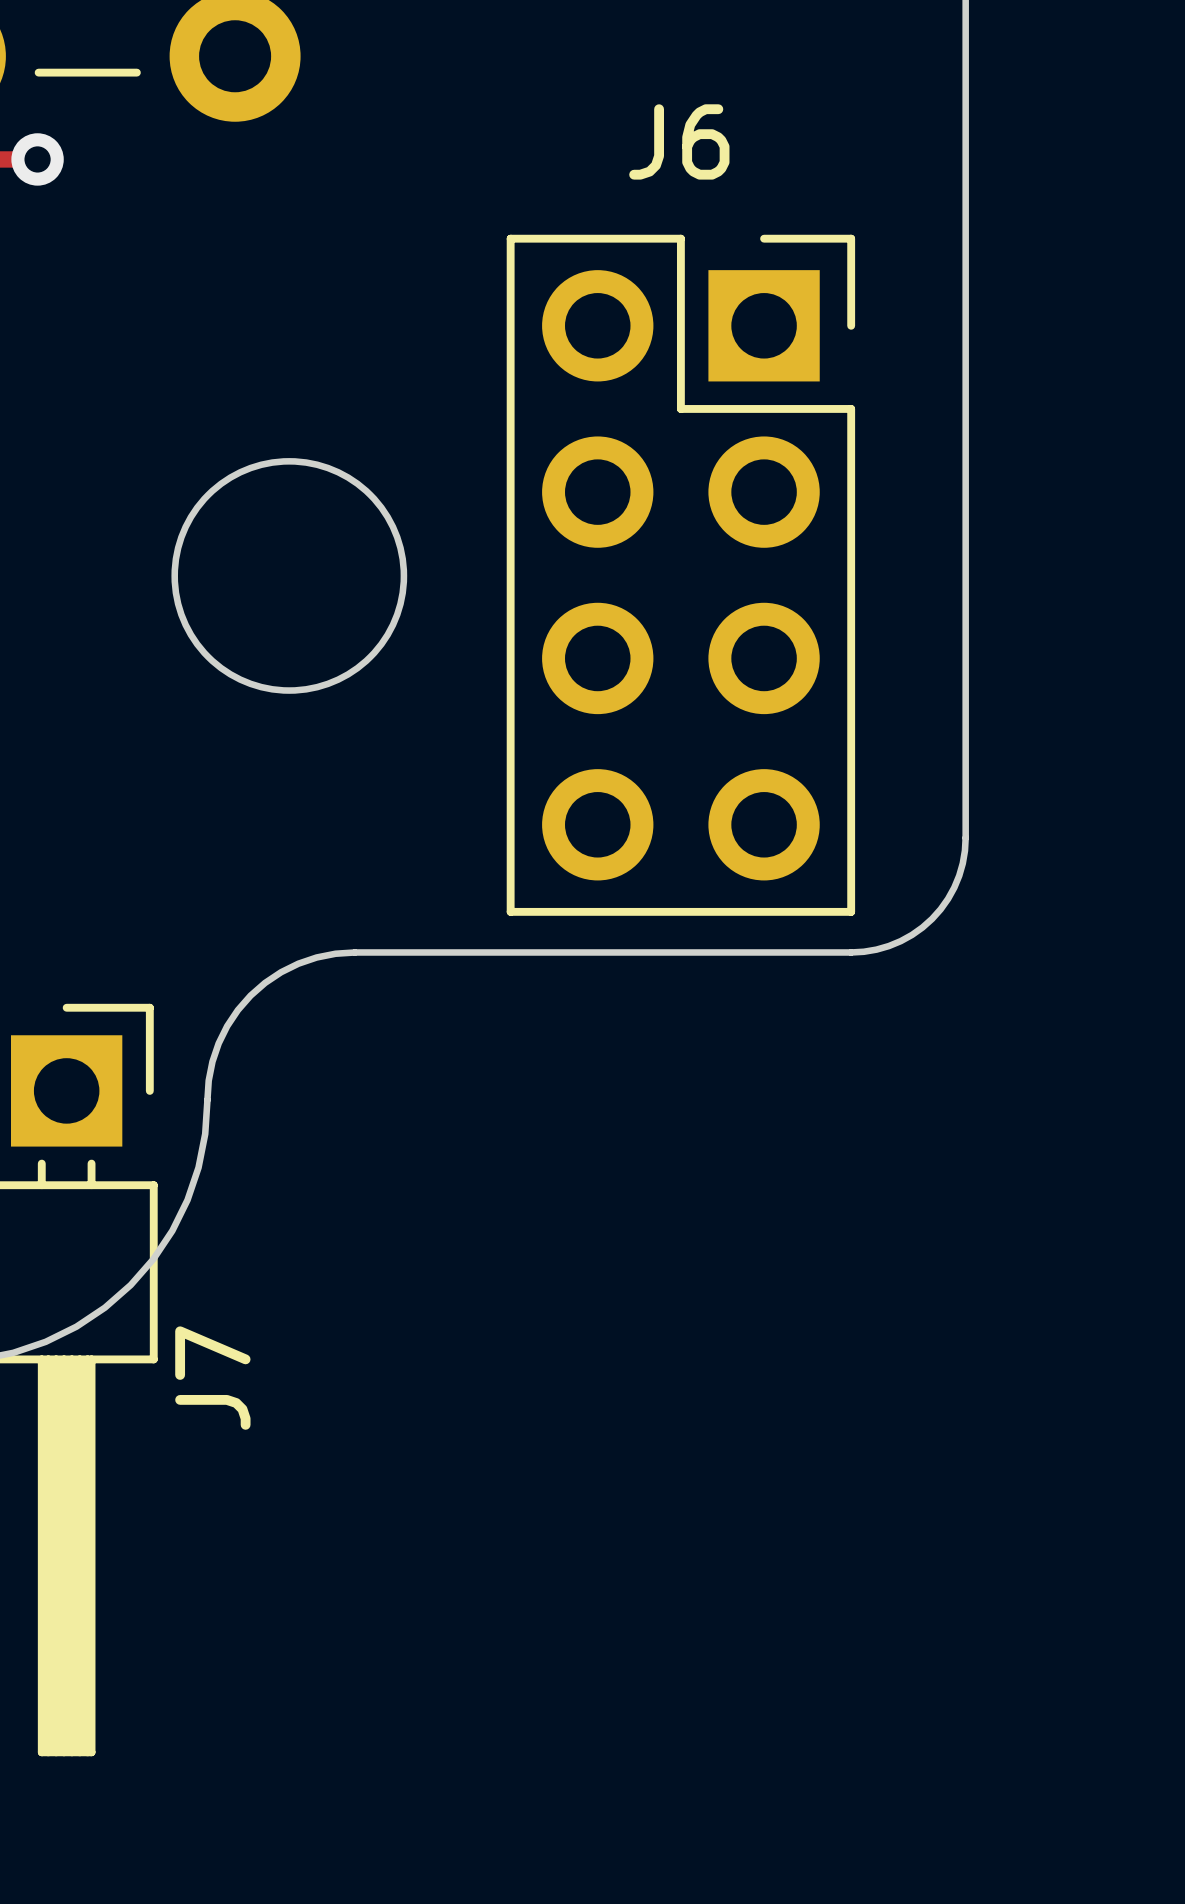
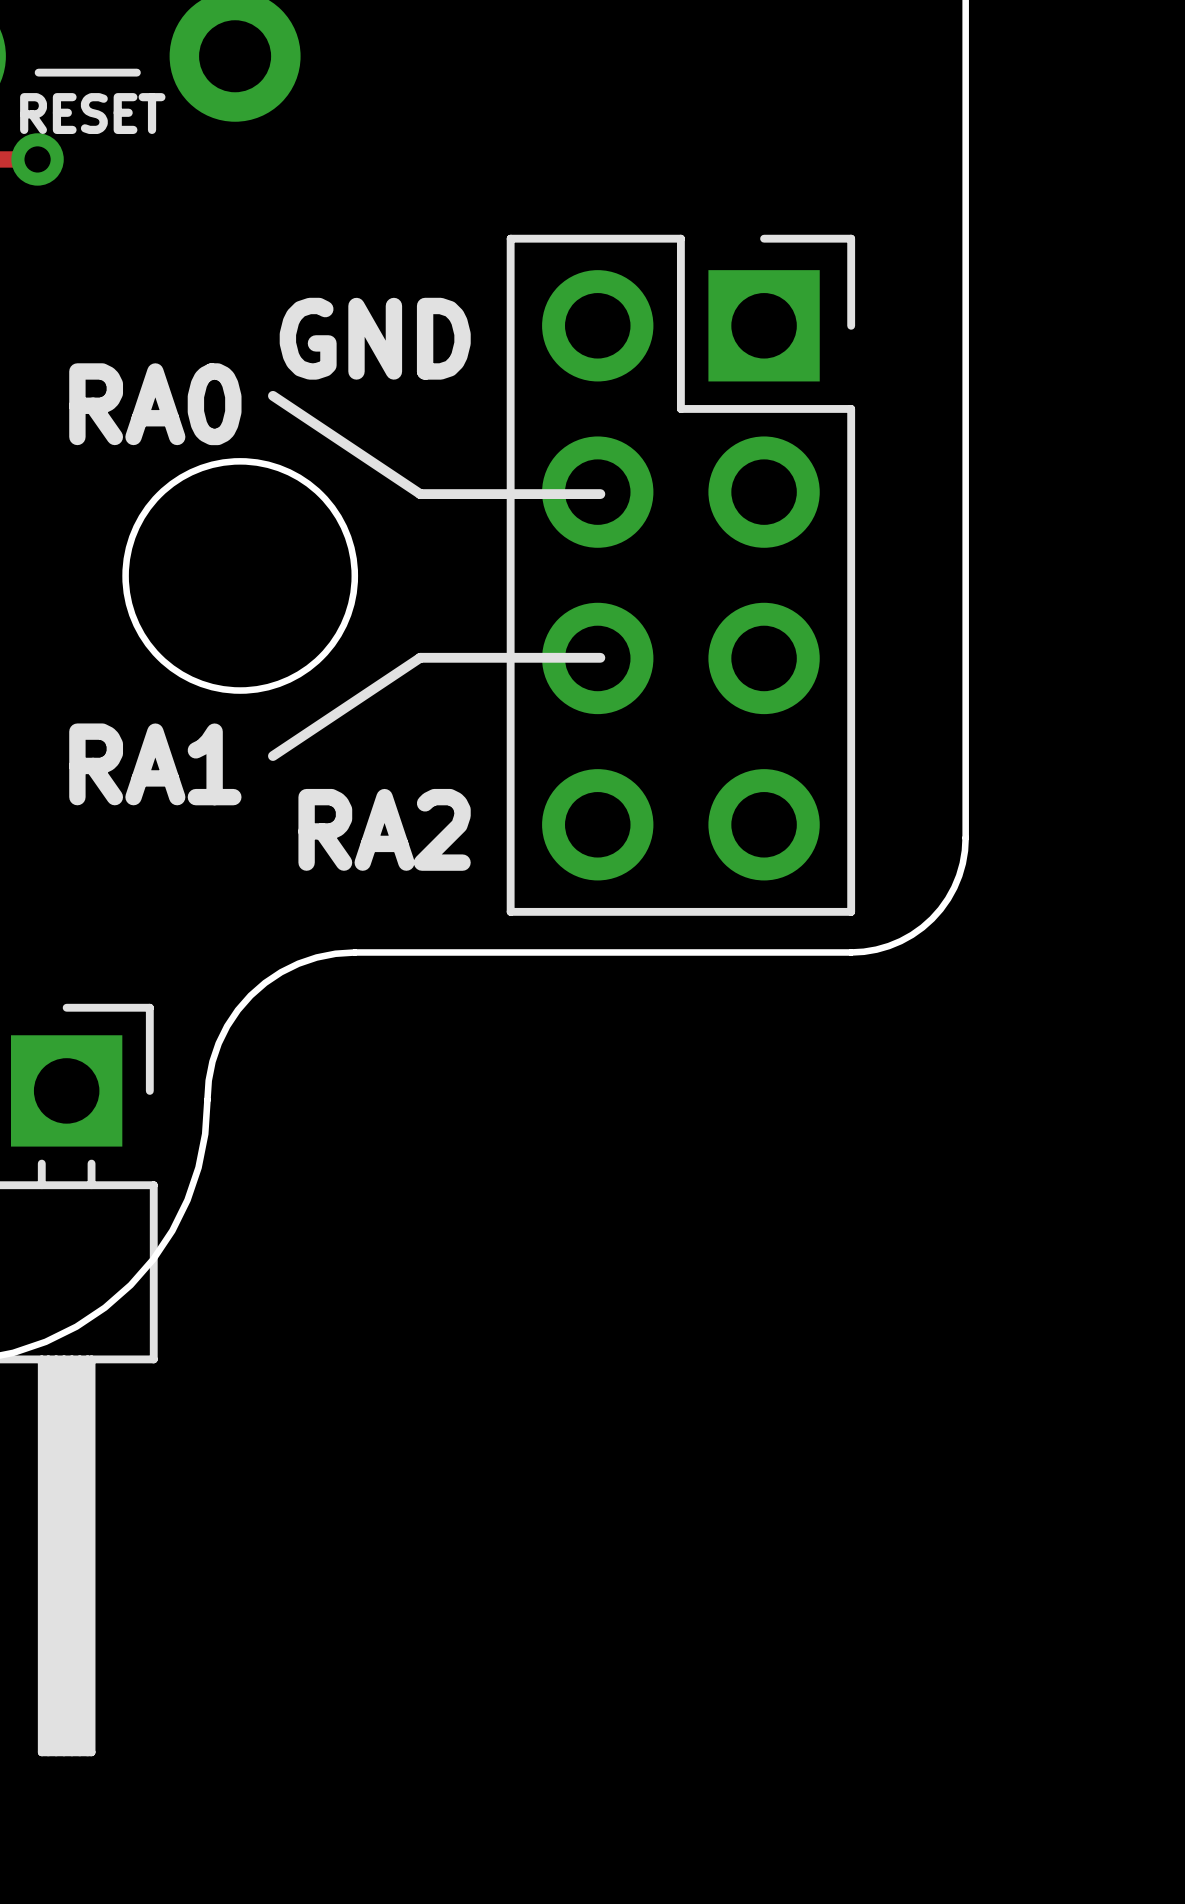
text: none -> RESET (92, 113)
J6 name: J6 (679, 141) -> none
text: none -> GND (375, 338)
line: none -> (272, 395) (420, 494) (600, 494)
text: none -> RA0 (155, 404)
round board edge position: (289, 575) -> (240, 575)
line: none -> (600, 657) (420, 657) (272, 756)
text: none -> RA1 (155, 764)
text: none -> RA2 (384, 829)
J7 name: J7 (212, 1378) -> none

